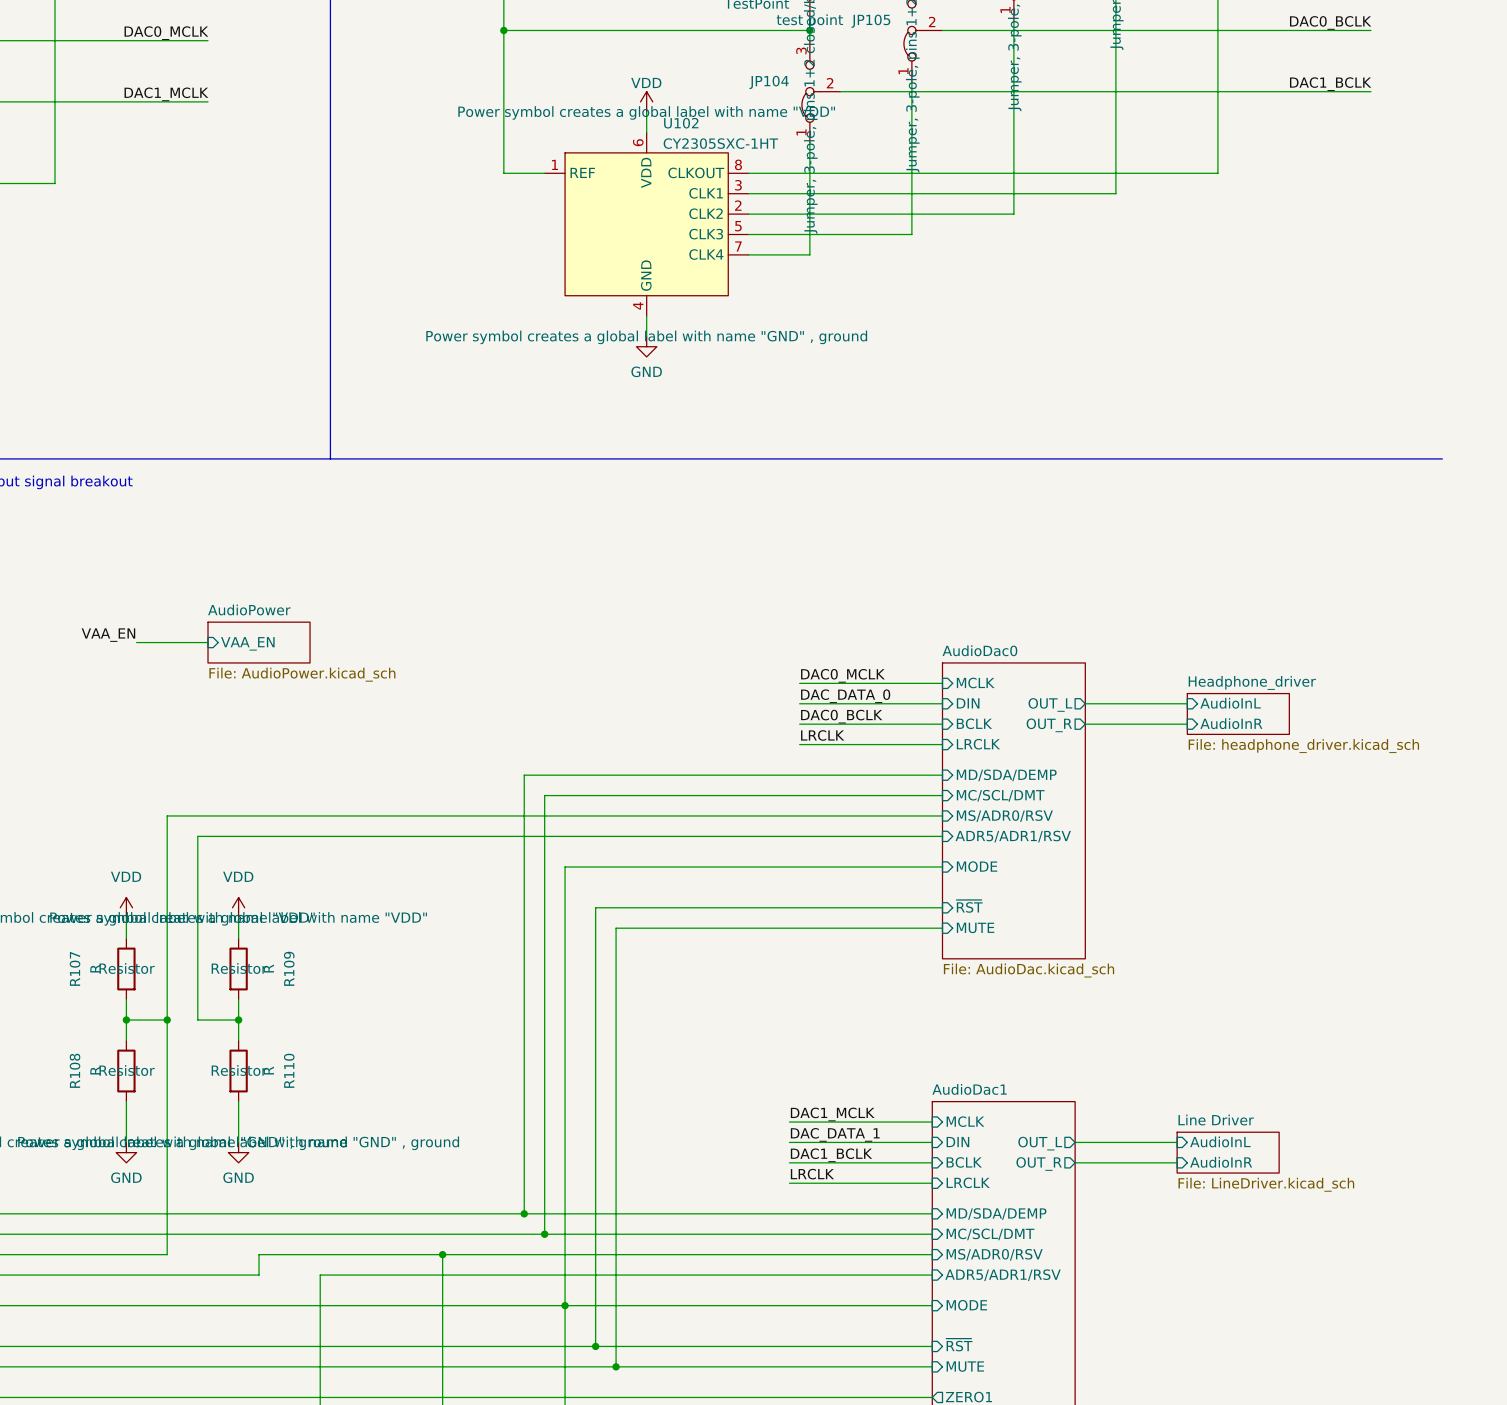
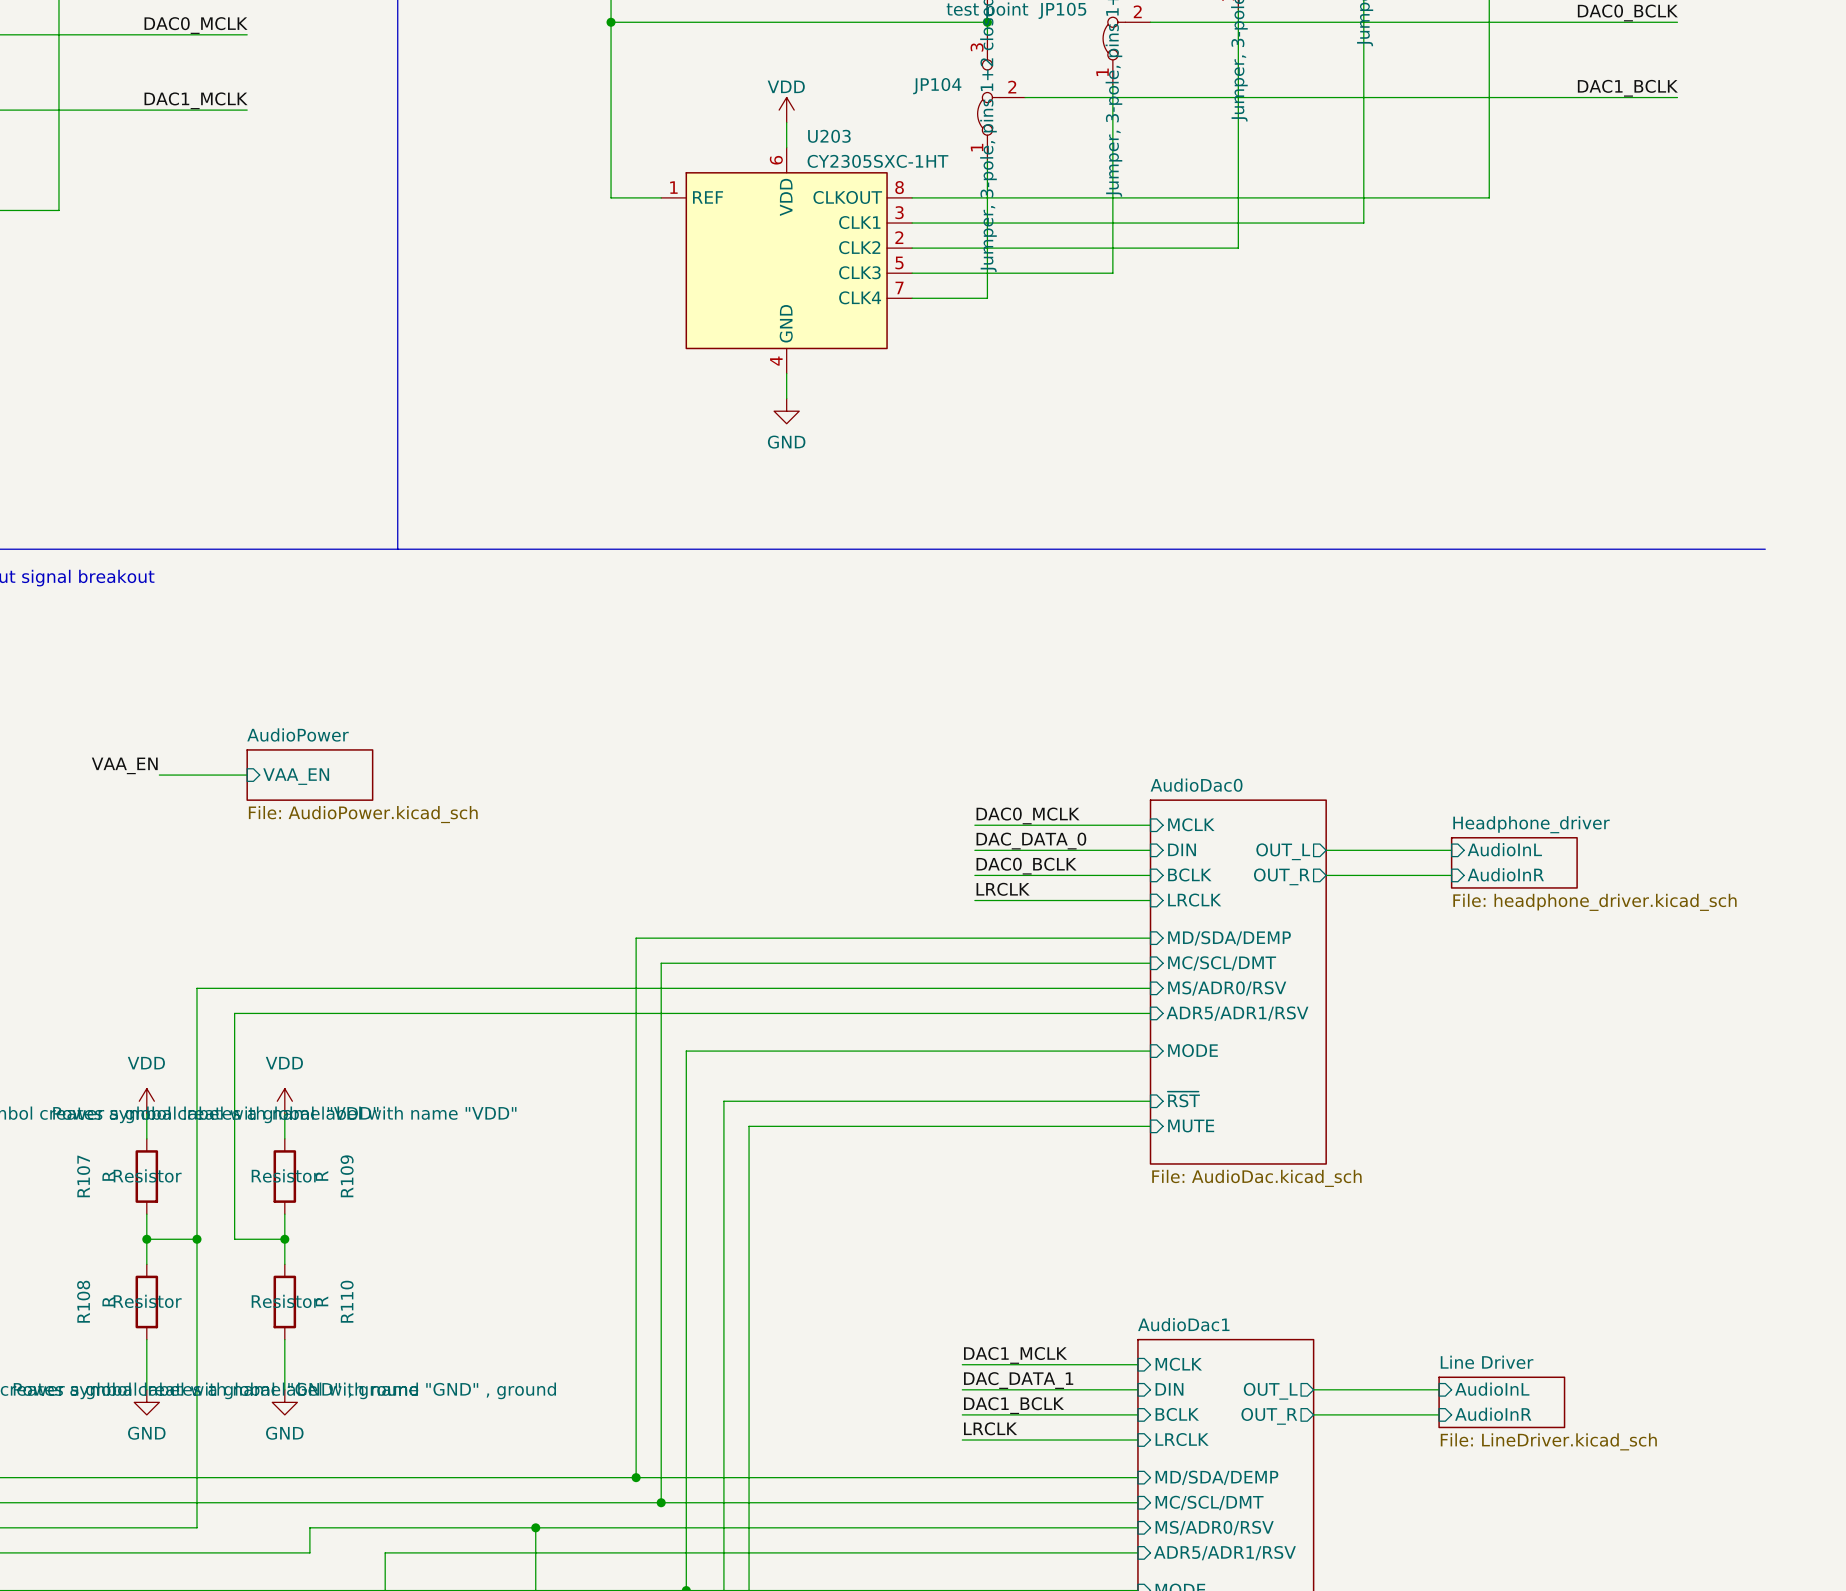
power symbol text: Power symbol creates a global label with name "VDD" (646, 112) -> none
U102 name: U102 (681, 123) -> U203 (829, 136)
power symbol text: Power symbol creates a global label with name "GND" , ground (646, 337) -> none

